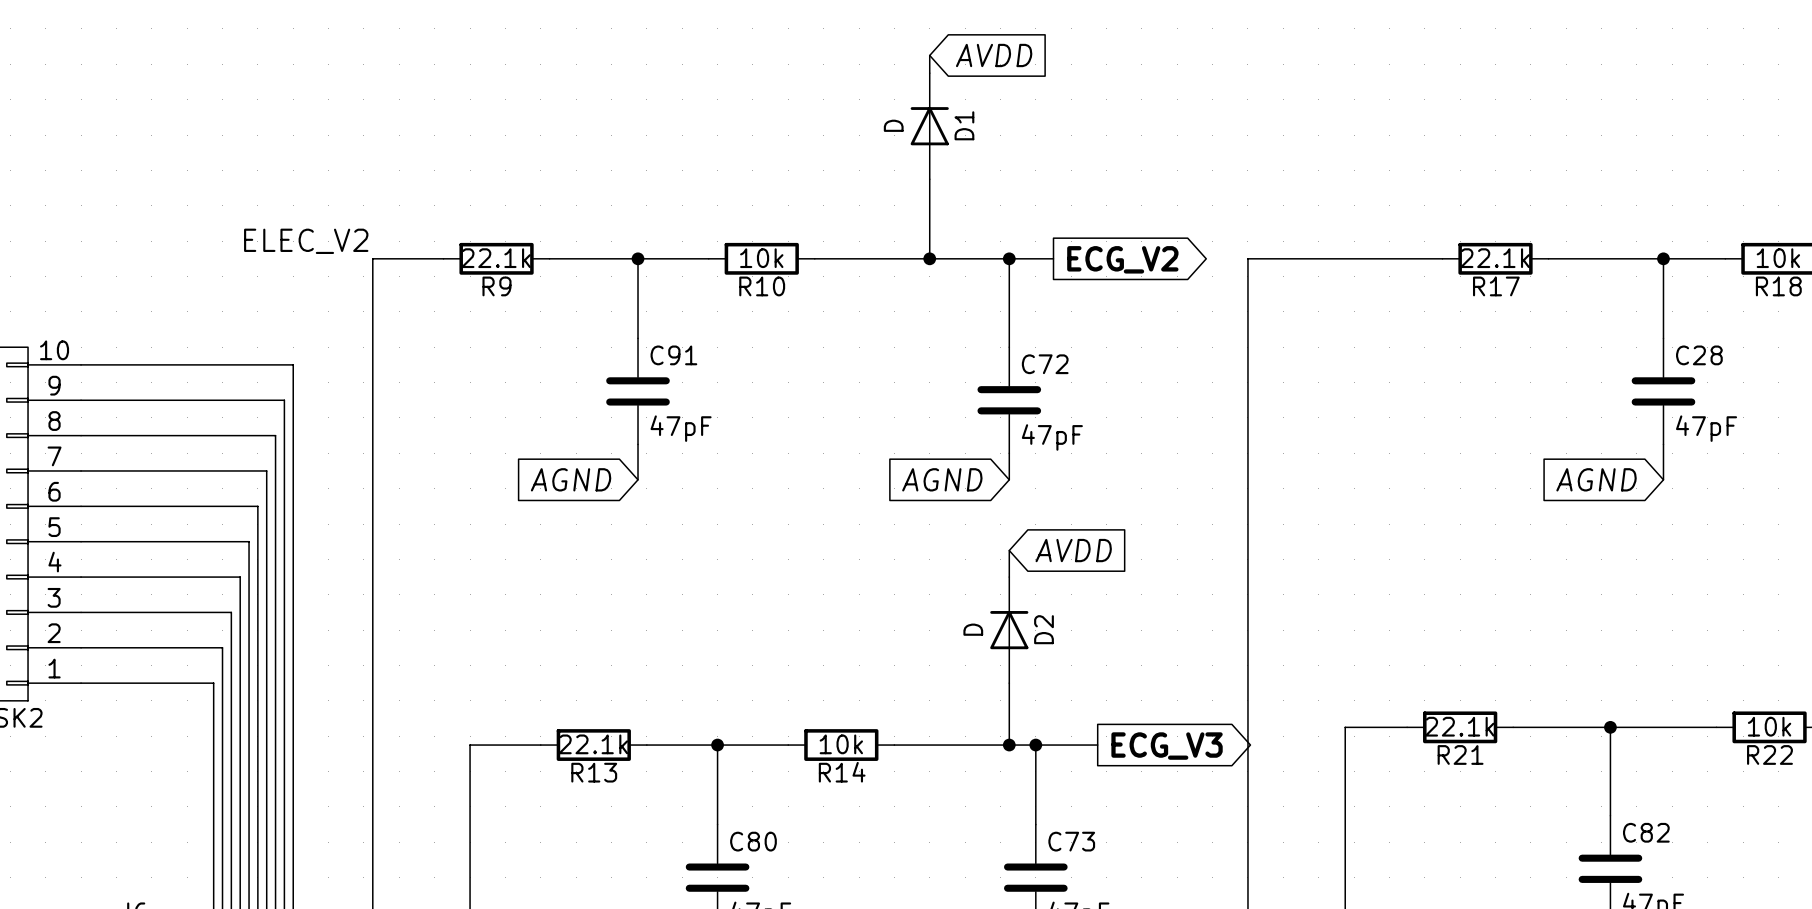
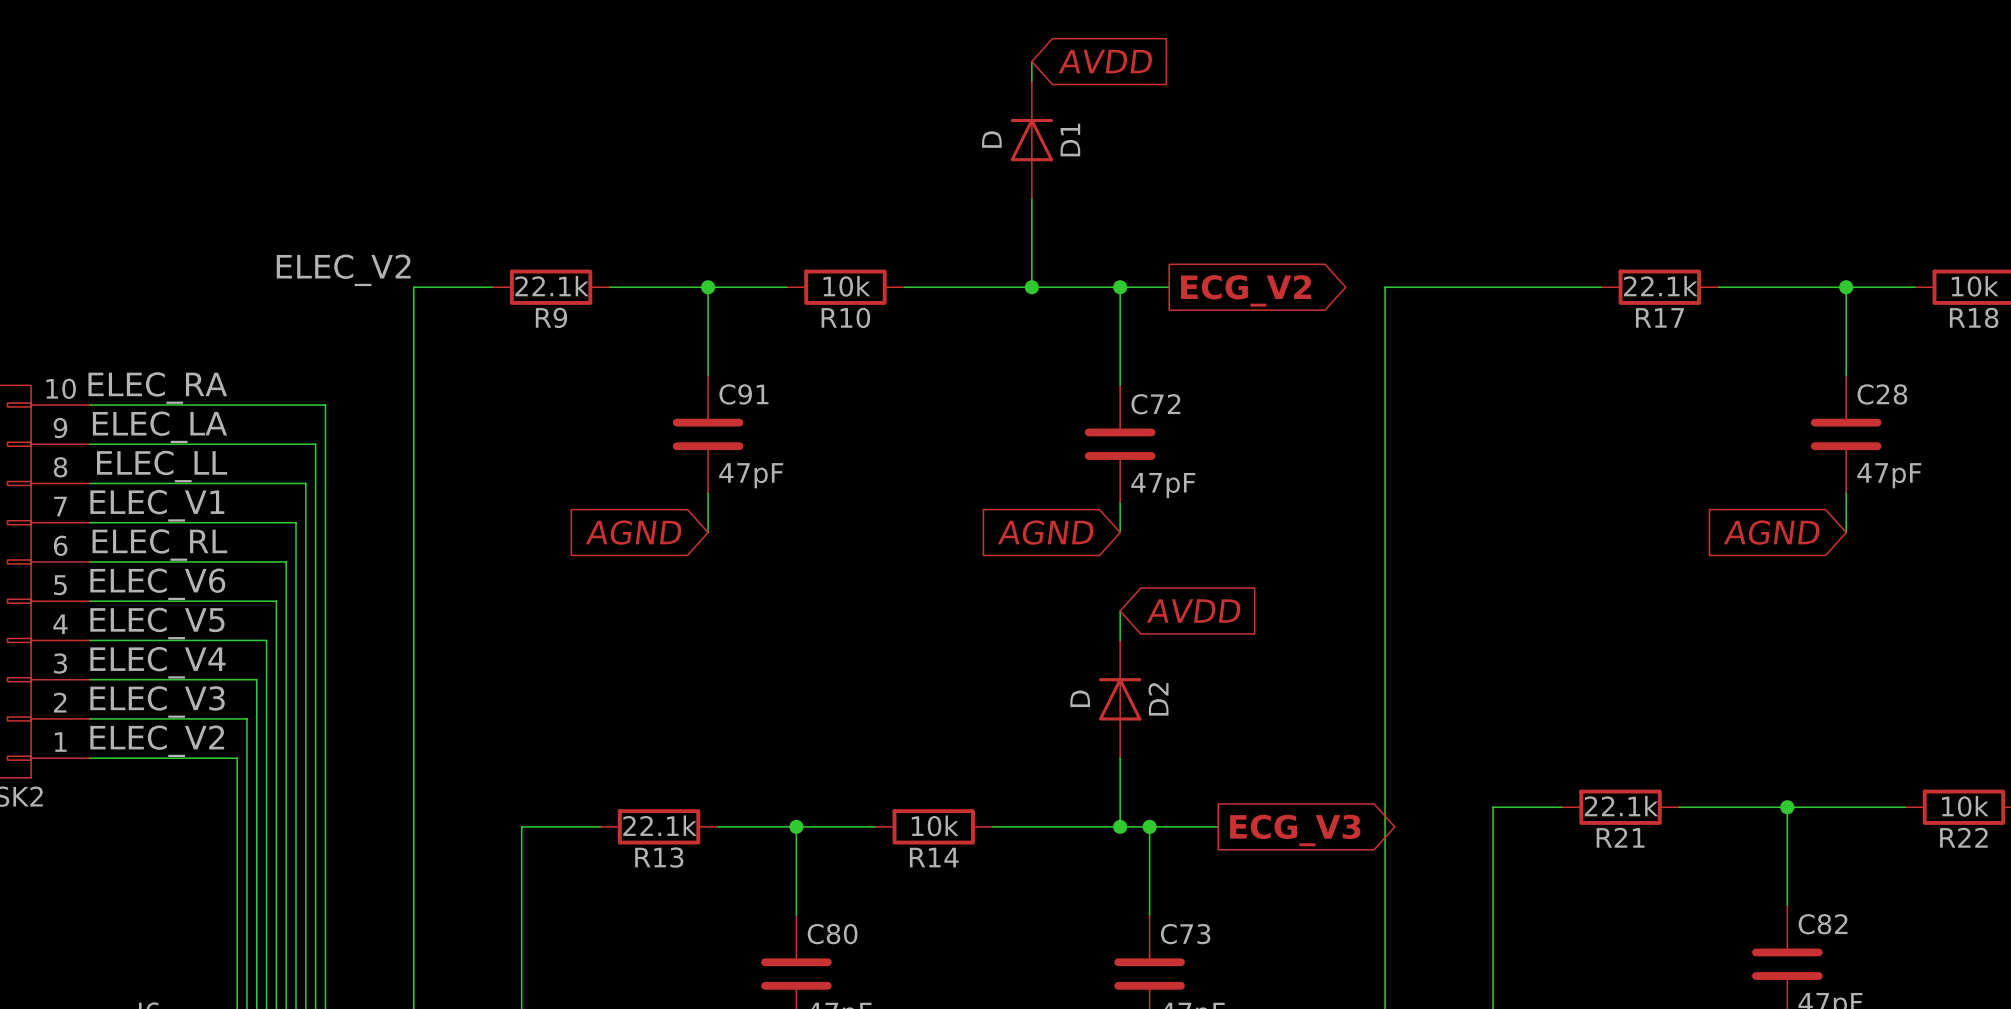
label: none -> ELEC_RA (157, 388)
label: none -> ELEC_LA (159, 427)
label: none -> ELEC_LL (162, 466)
label: none -> ELEC_V1 (157, 505)
label: none -> ELEC_RL (159, 545)
label: none -> ELEC_V6 (157, 584)
label: none -> ELEC_V5 (157, 623)
label: none -> ELEC_V4 (157, 662)
label: none -> ELEC_V3 (157, 702)
label: none -> ELEC_V2 (157, 741)

